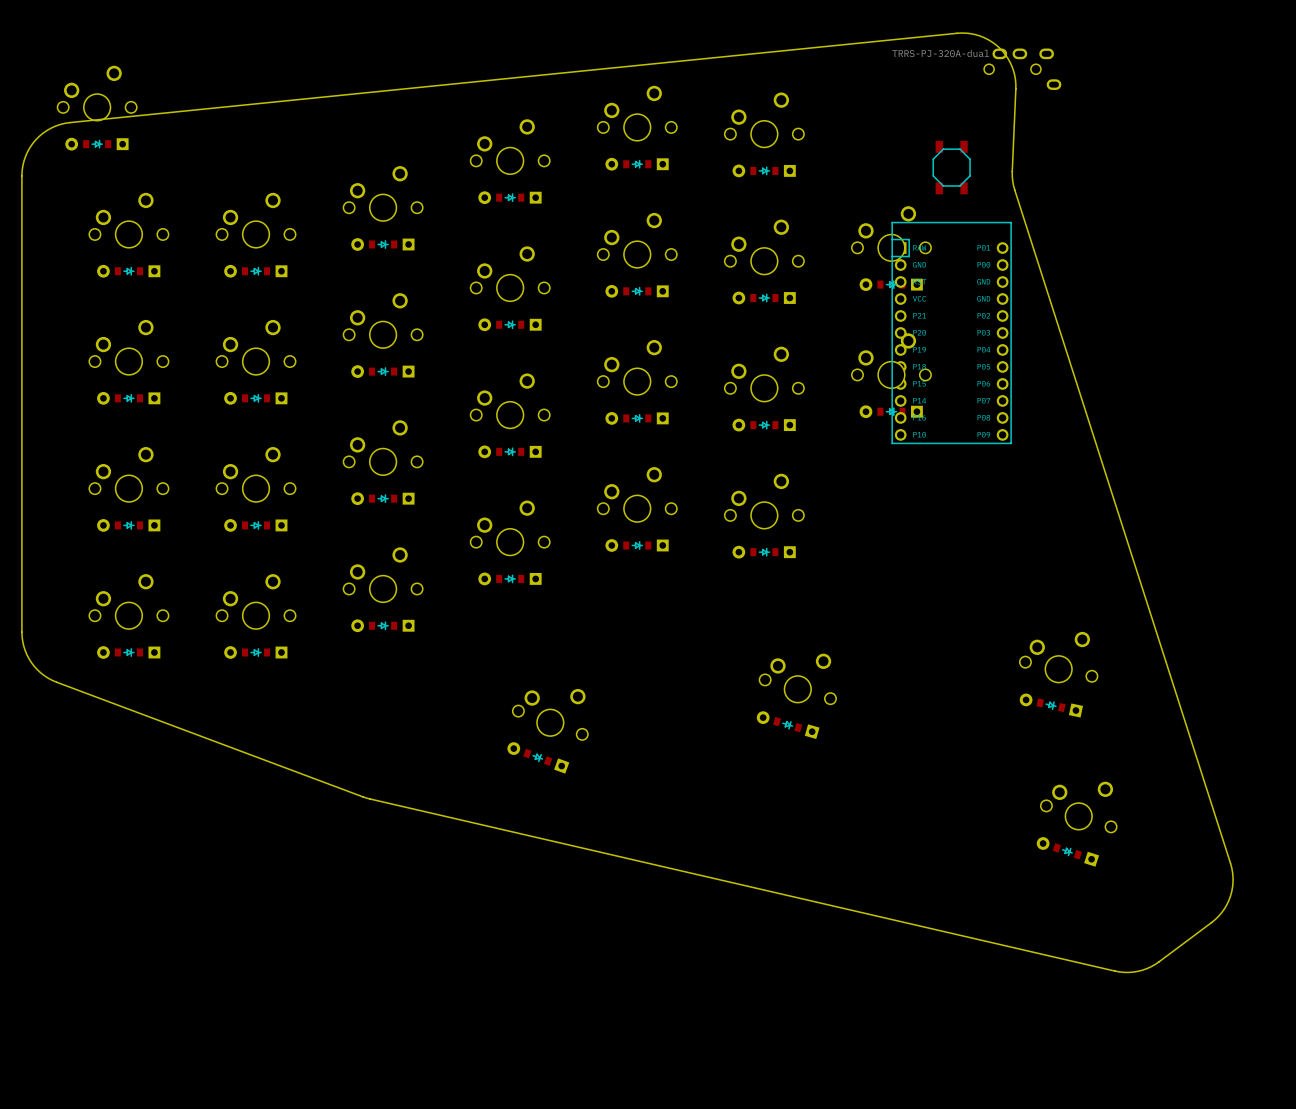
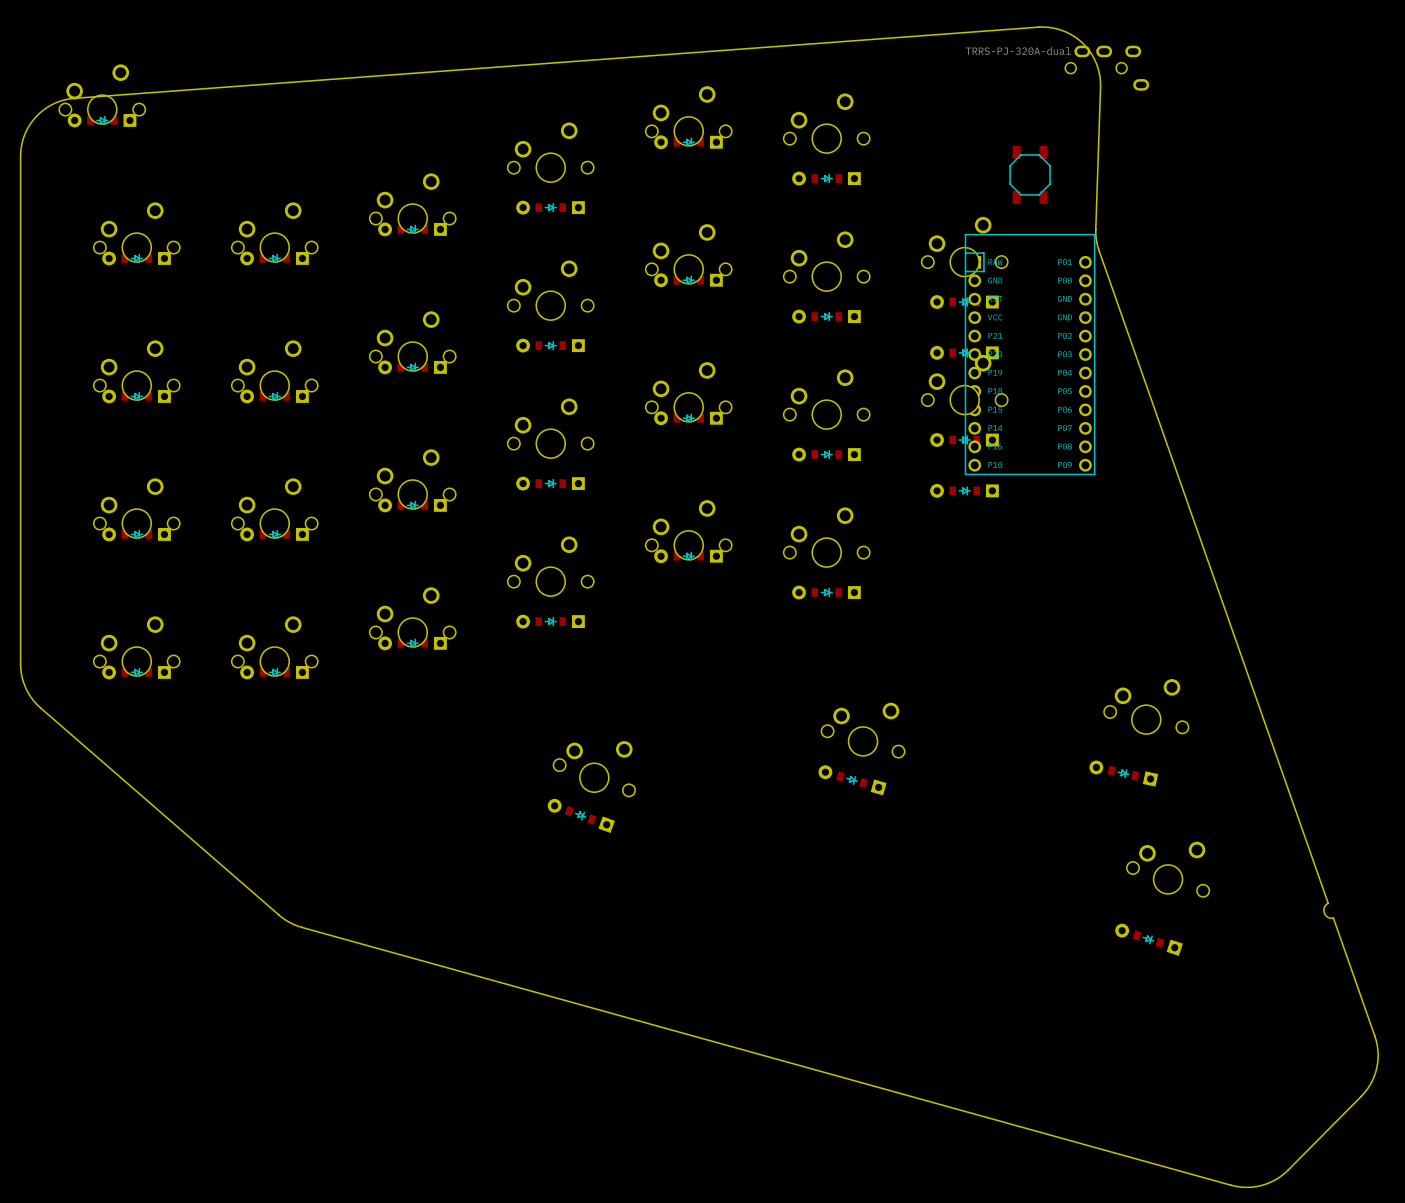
part position: (96, 144) -> (102, 120)
part position: (637, 164) -> (688, 142)
board edge: (21, 175) (25, 156) (35, 139) (51, 128) (70, 122) (957, 33) (975, 34) (988, 39) (1005, 54) (1013, 70) (1015, 84) (1012, 171) (1013, 185) (1230, 863) (1233, 877) (1231, 891) (1226, 904) (1215, 919) (1159, 961) (1138, 971) (1114, 971) (366, 798) (52, 680) (37, 669) (26, 654) (22, 641) (21, 618) -> (20, 183) (21, 146) (27, 128) (43, 110) (55, 102) (69, 98) (1038, 27) (1057, 29) (1075, 37) (1091, 54) (1100, 77) (1095, 229) (1097, 247) (1328, 903) (1324, 906) (1324, 912) (1327, 917) (1333, 918) (1374, 1036) (1378, 1054) (1375, 1072) (1364, 1092) (1284, 1173) (1266, 1183) (1241, 1187) (301, 927) (279, 915) (40, 707) (25, 688) (20, 664)
part position: (382, 244) -> (412, 229)
part position: (128, 271) -> (136, 258)
part position: (255, 271) -> (274, 258)
part position: (637, 291) -> (688, 280)
part: none -> (964, 352)
part position: (382, 371) -> (412, 367)
part position: (128, 398) -> (136, 396)
part position: (255, 398) -> (274, 396)
part position: (637, 418) -> (688, 418)
part: none -> (964, 490)
part position: (382, 498) -> (412, 505)
part position: (128, 525) -> (136, 534)
part position: (255, 525) -> (274, 534)
part position: (637, 545) -> (688, 556)
part position: (382, 625) -> (412, 643)
part position: (128, 652) -> (136, 672)
part position: (255, 652) -> (274, 672)
part position: (1051, 705) -> (1123, 773)
part position: (1067, 851) -> (1149, 939)

